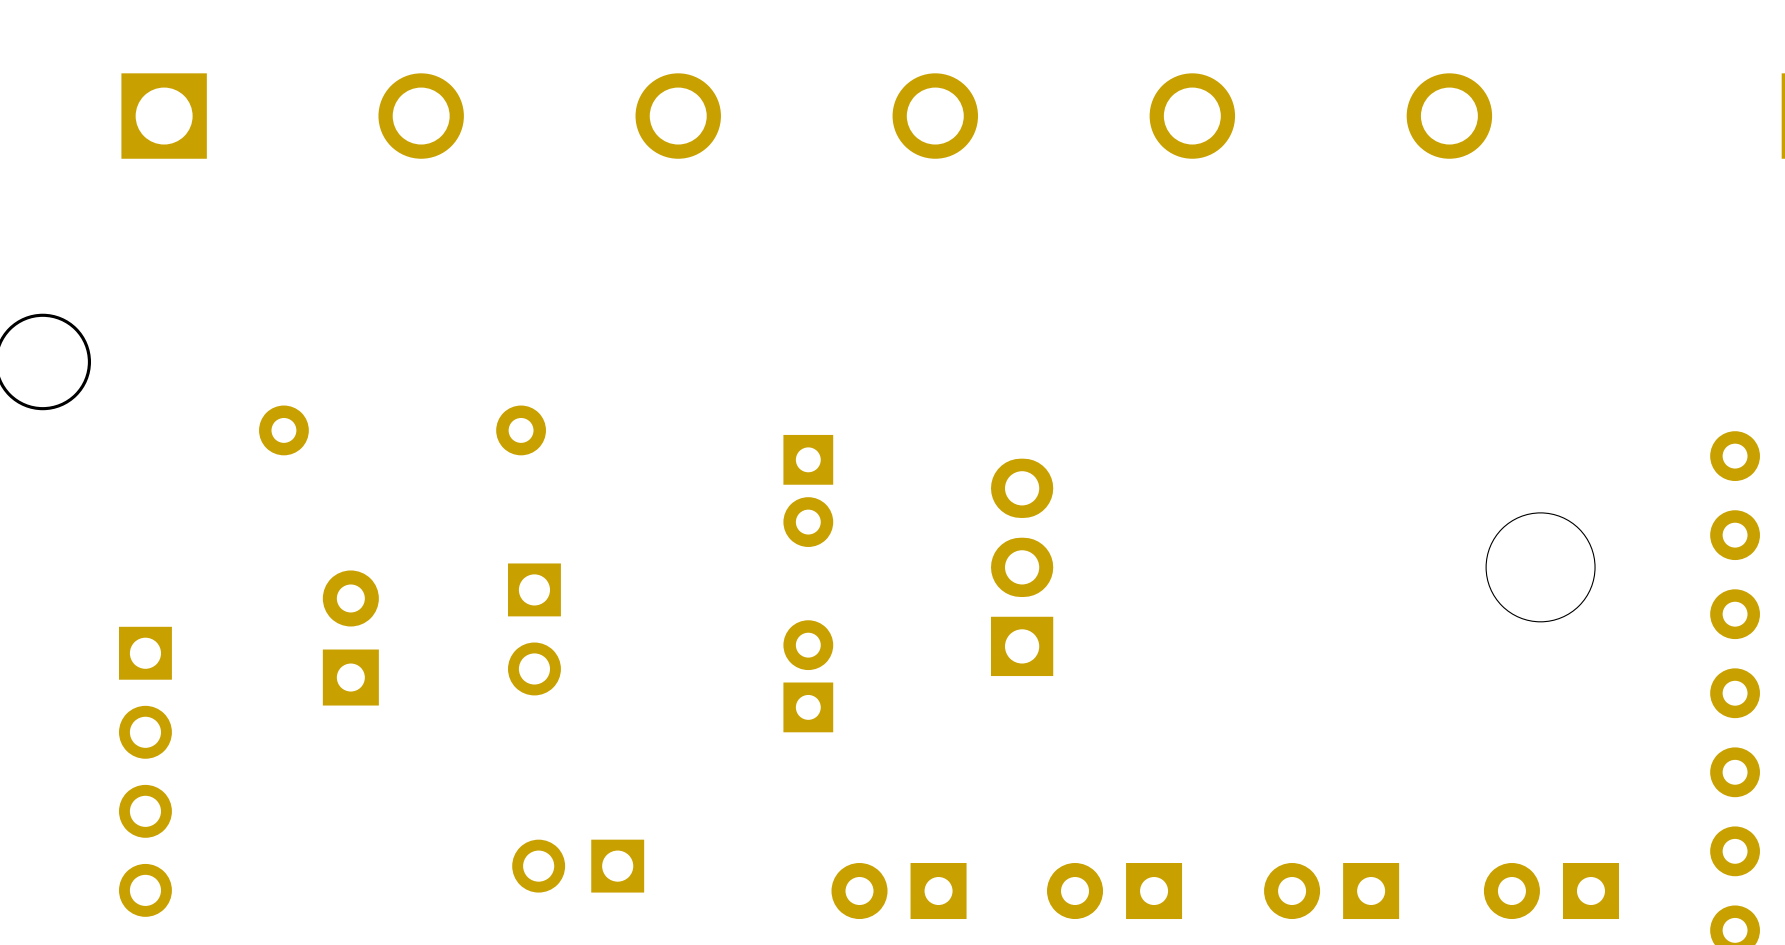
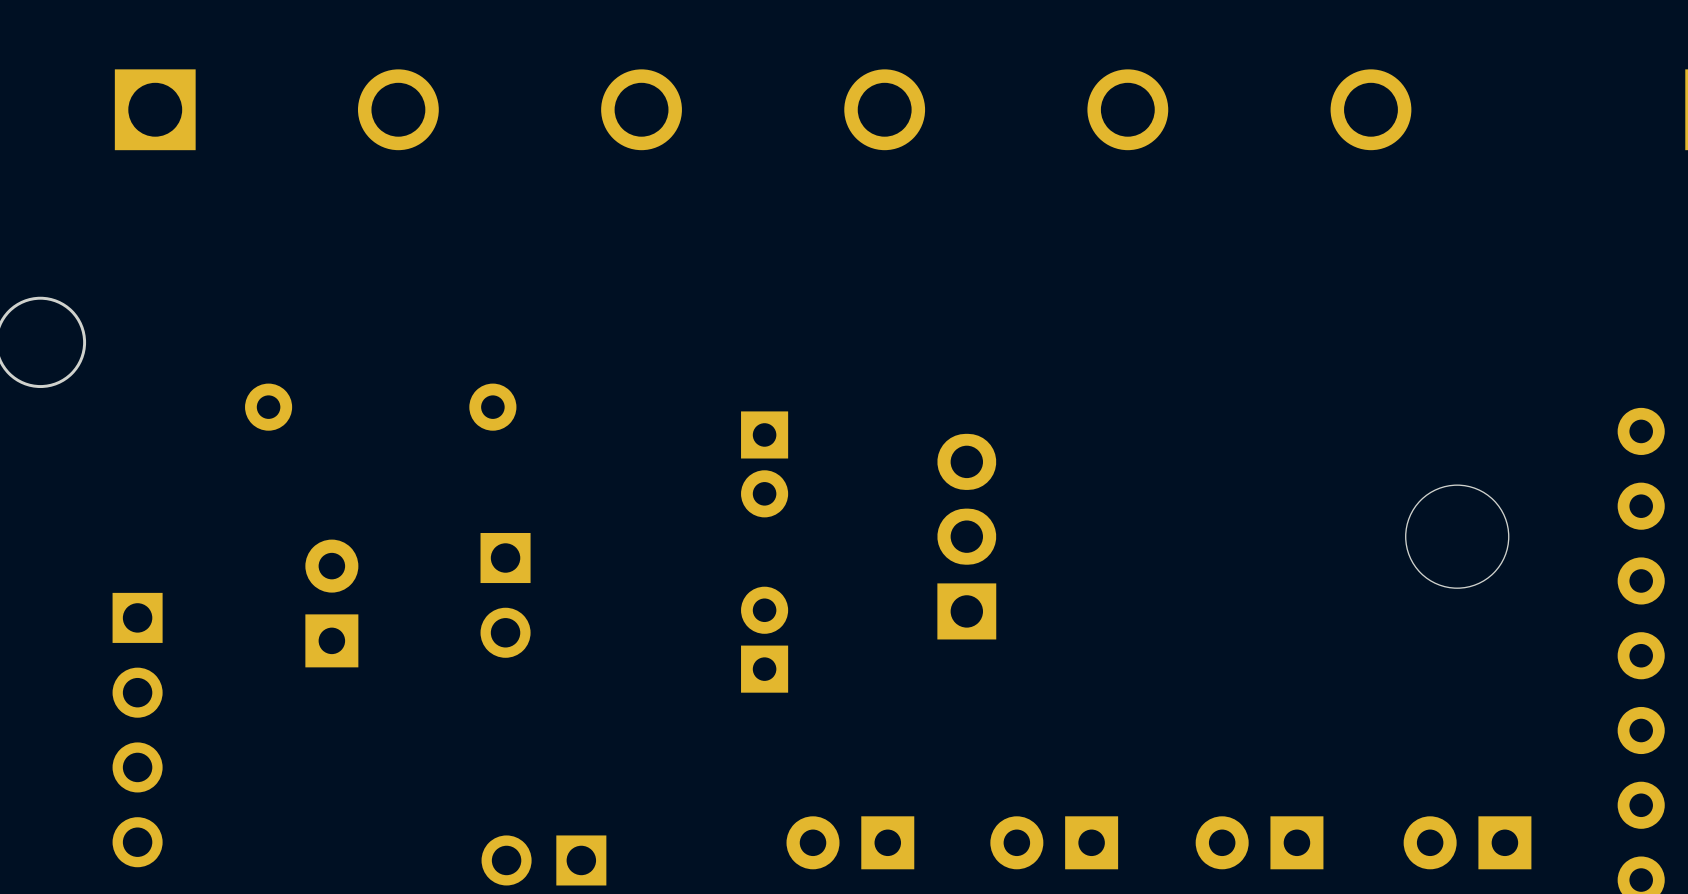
part position: (578, 866) -> (543, 860)

